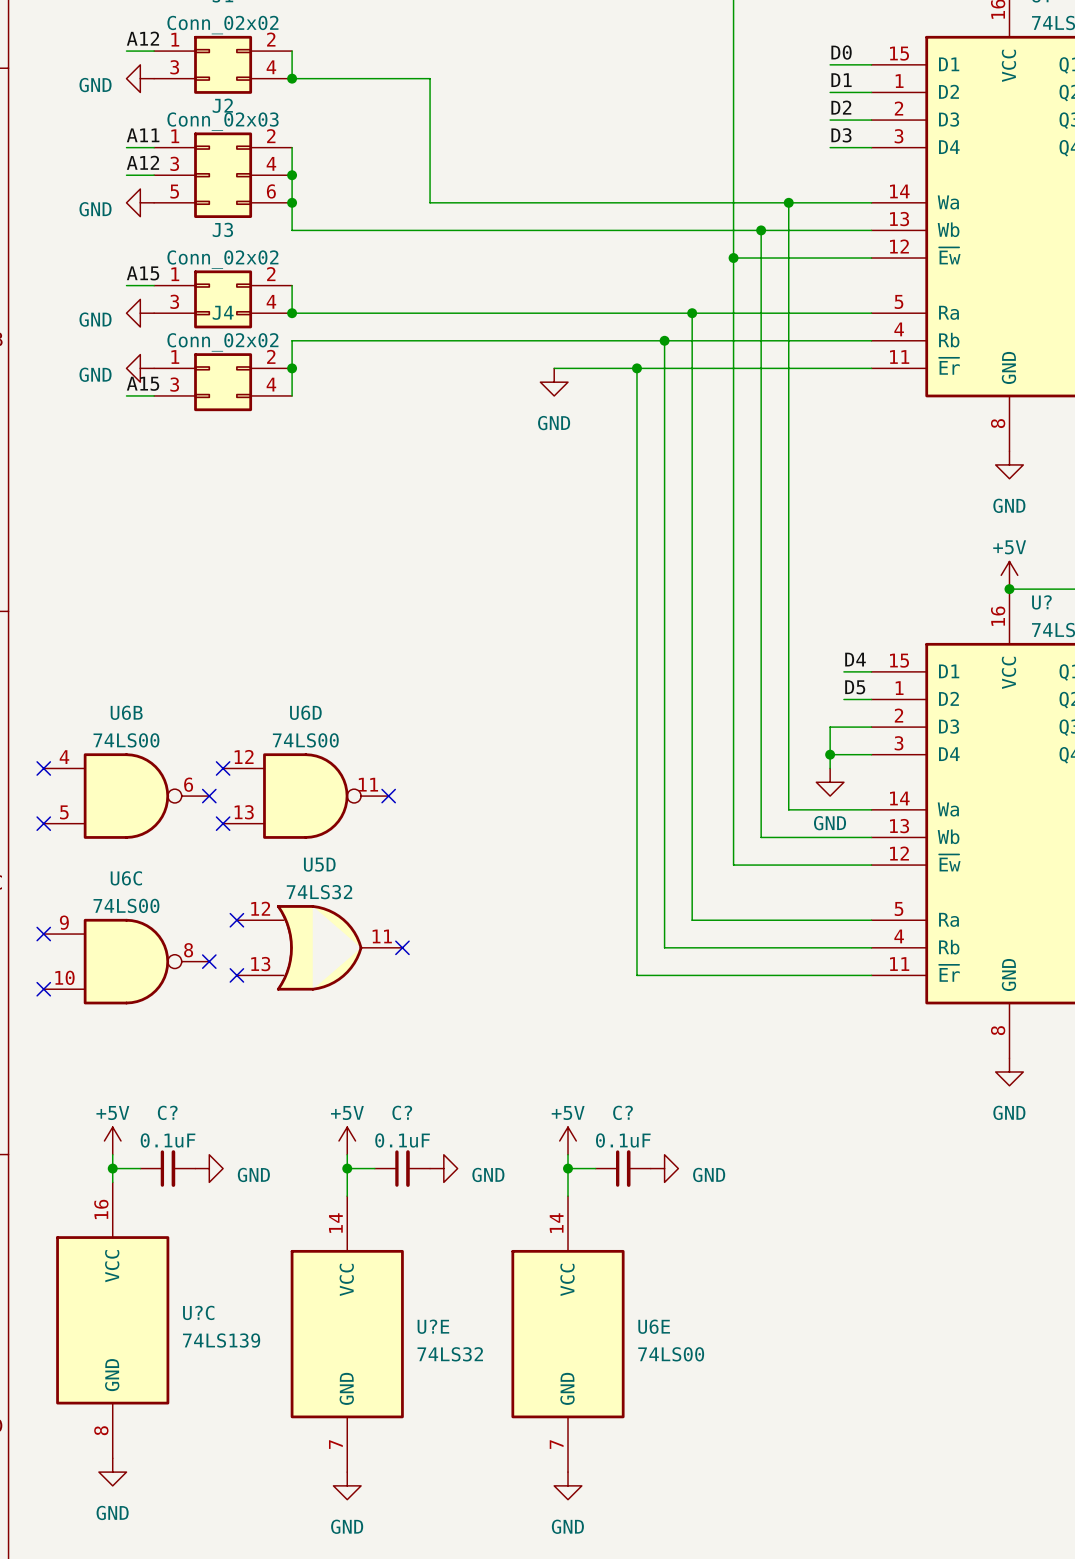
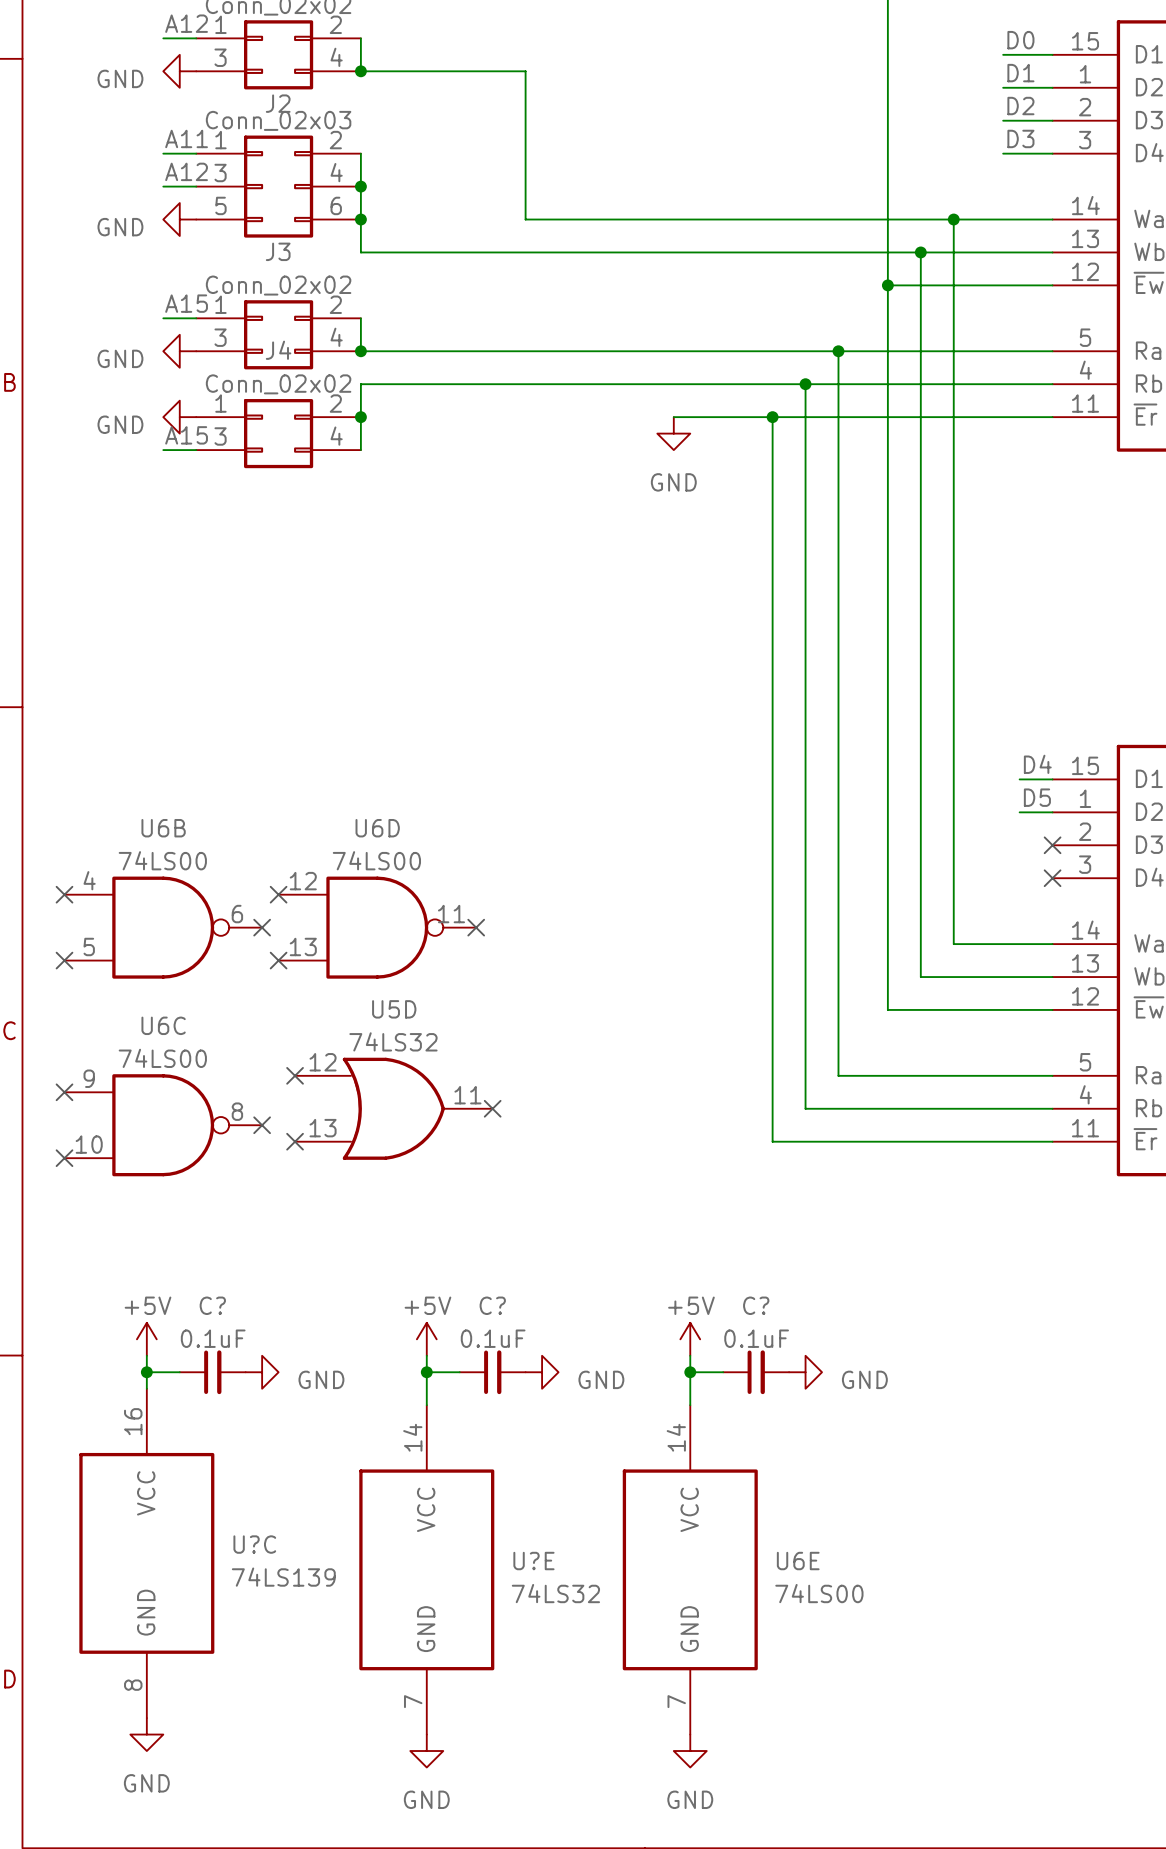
wire: (871, 727) (830, 727) (830, 768) -> none
no-connect mark: none -> (1052, 845)
wire: (830, 754) (871, 754) -> none
junction: (830, 754) -> none
no-connect mark: none -> (1052, 878)
power symbol: GND (830, 782) -> none

